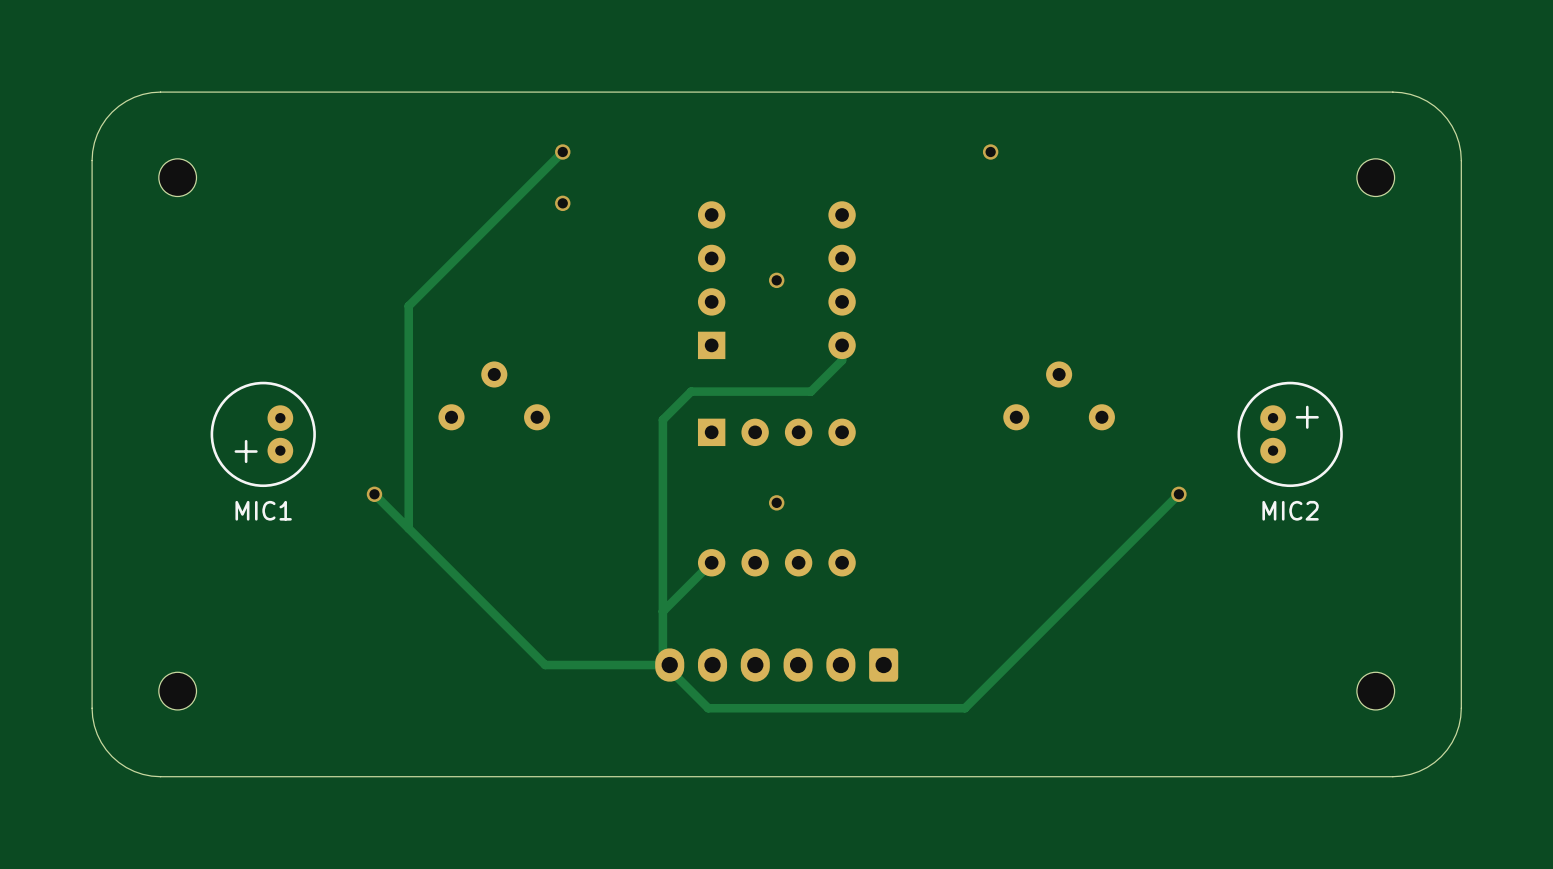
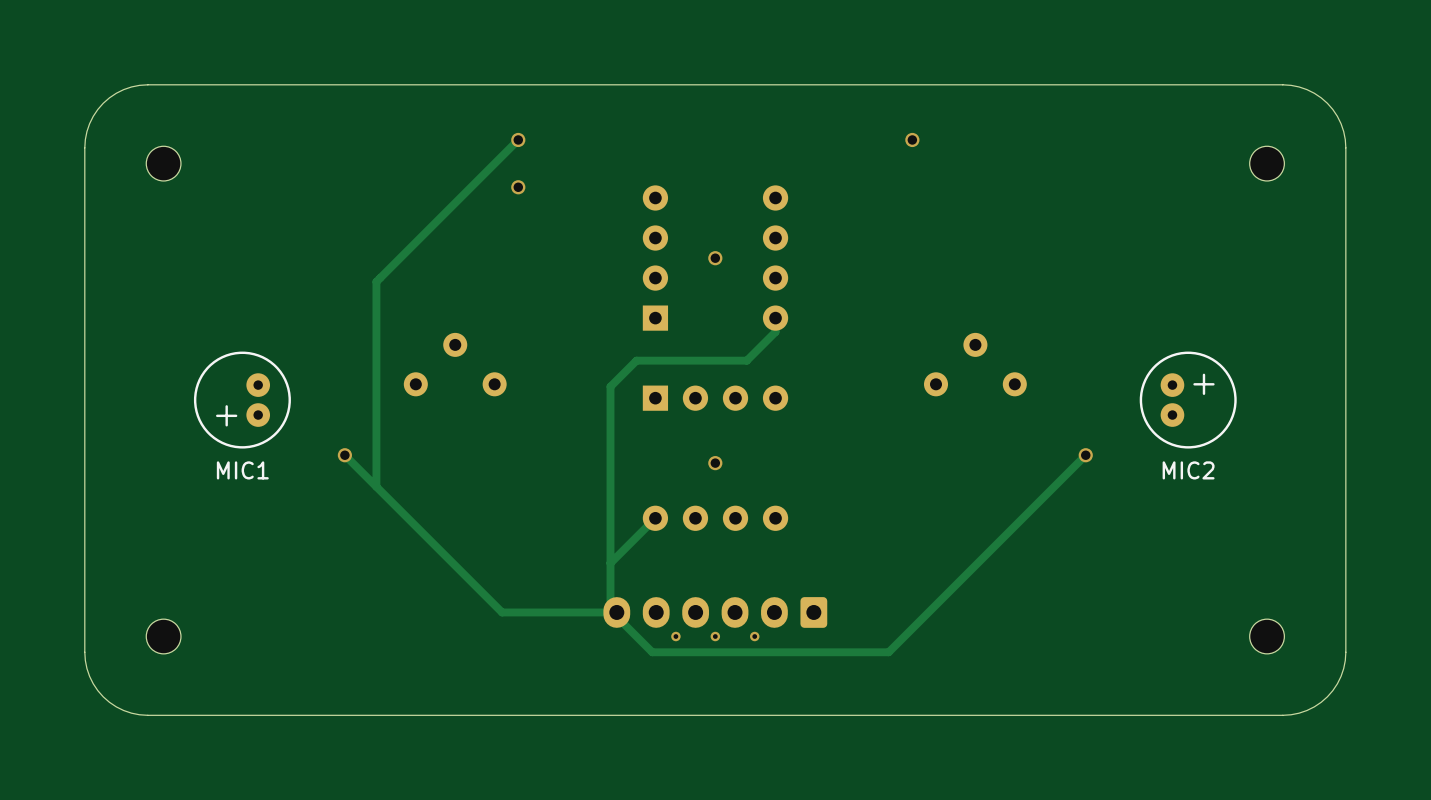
via: none -> (675, 636)
via: none -> (715, 636)
via: none -> (754, 636)

